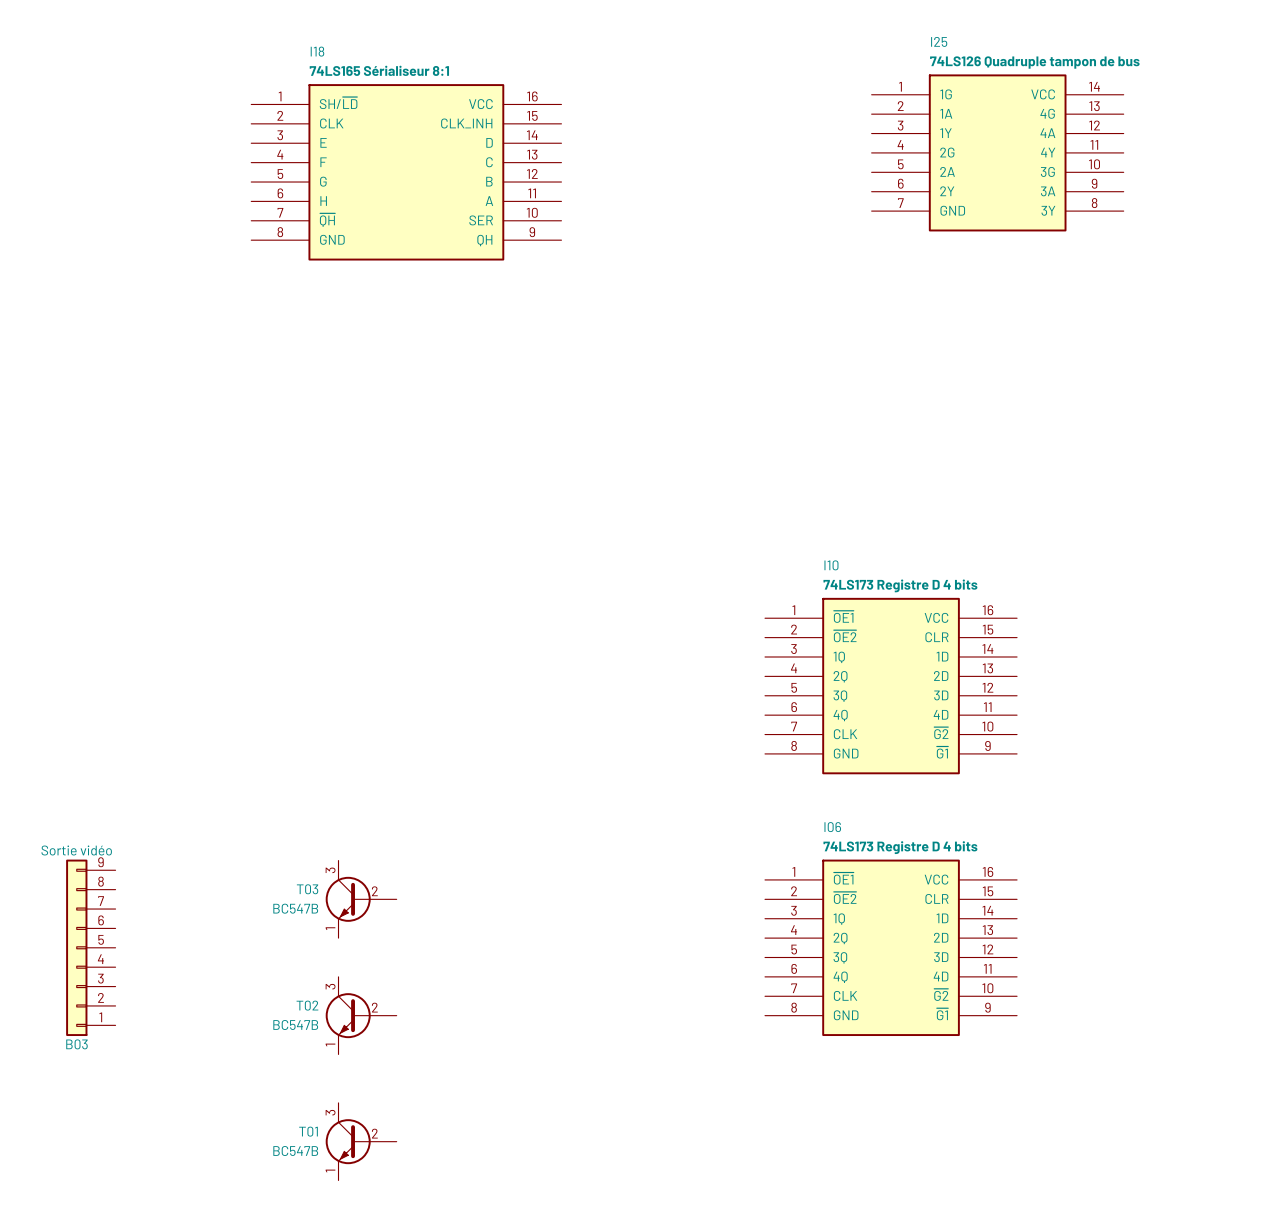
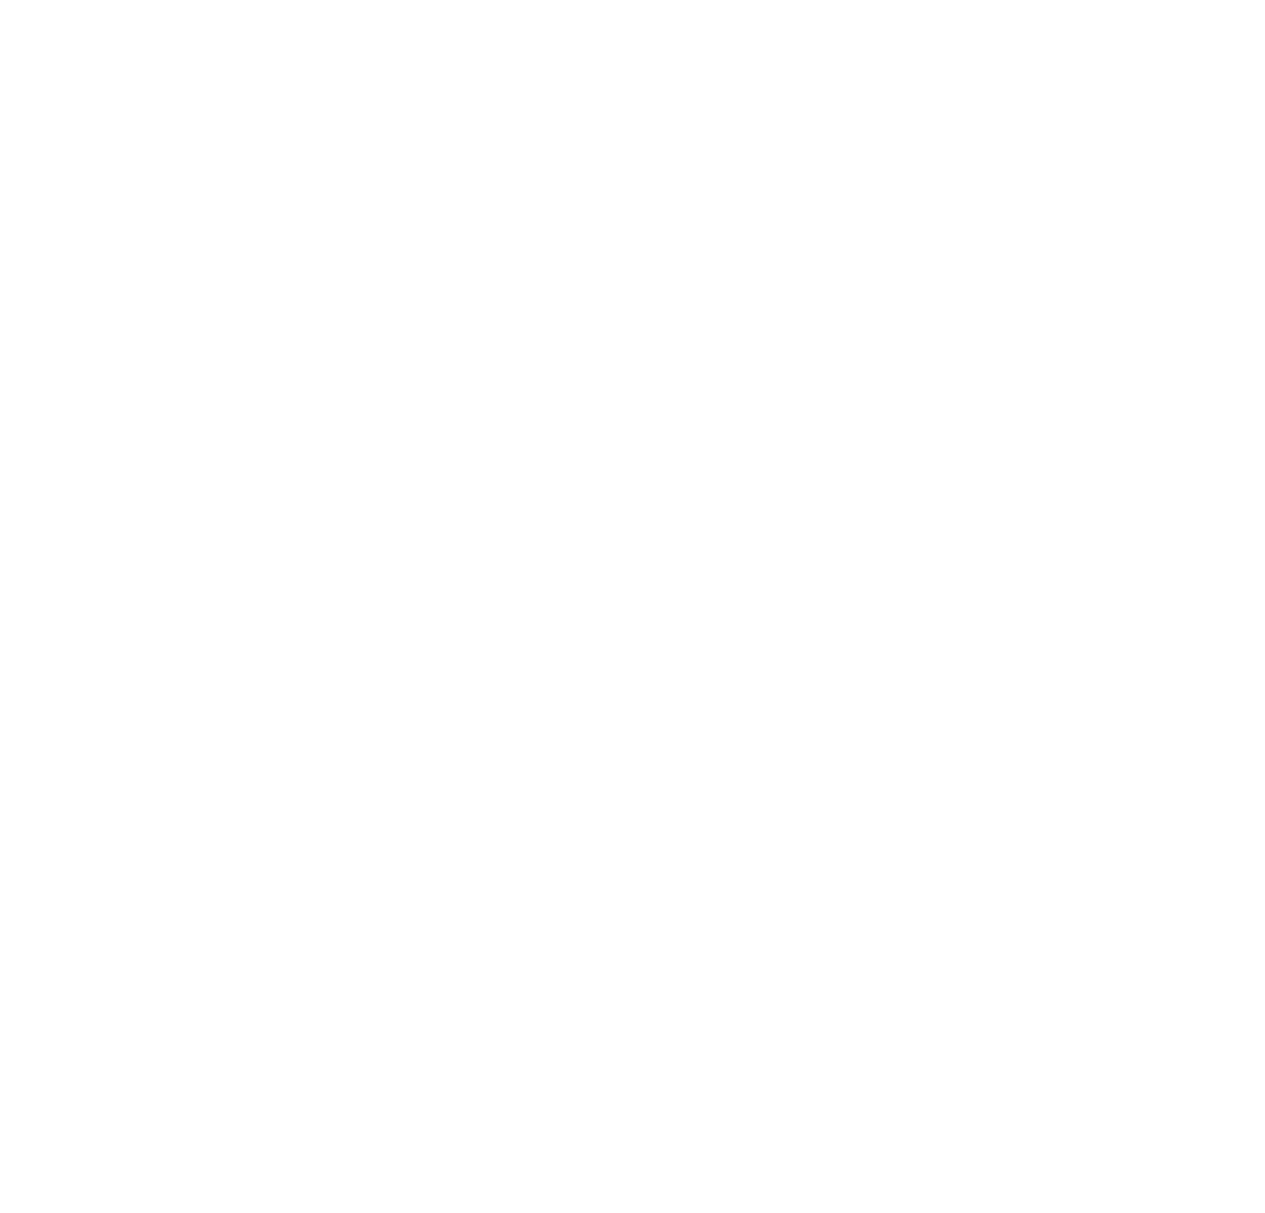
I25: 74LS126 Quadruple tampon de bus (997, 152) -> none
I18: 74LS165 Sérialiseur 8:1 (406, 172) -> none
I10: 74LS173 Registre D 4 bits (891, 686) -> none
T03: BC547B (361, 899) -> none
B03: Sortie vidéo (90, 947) -> none
I06: 74LS173 Registre D 4 bits (891, 947) -> none
T02: BC547B (361, 1015) -> none
T01: BC547B (361, 1141) -> none

